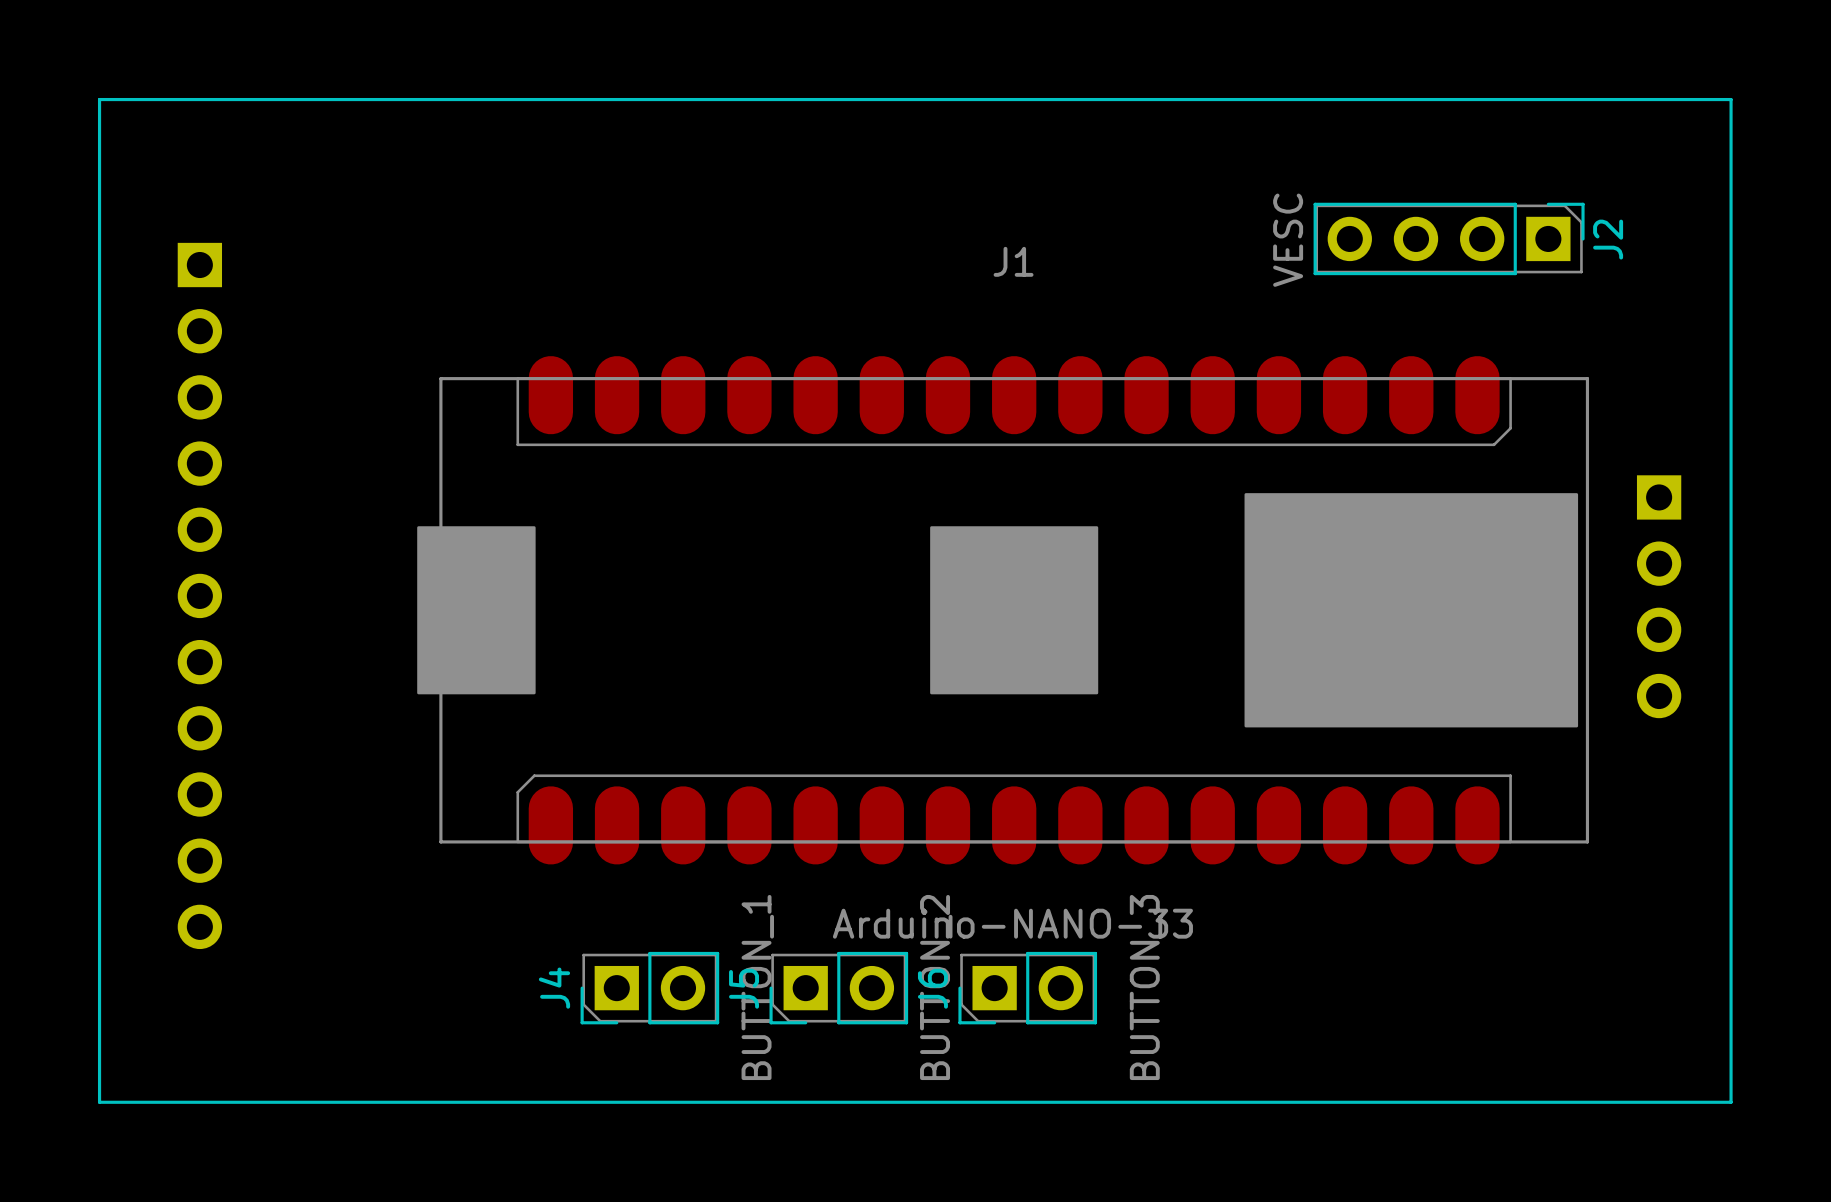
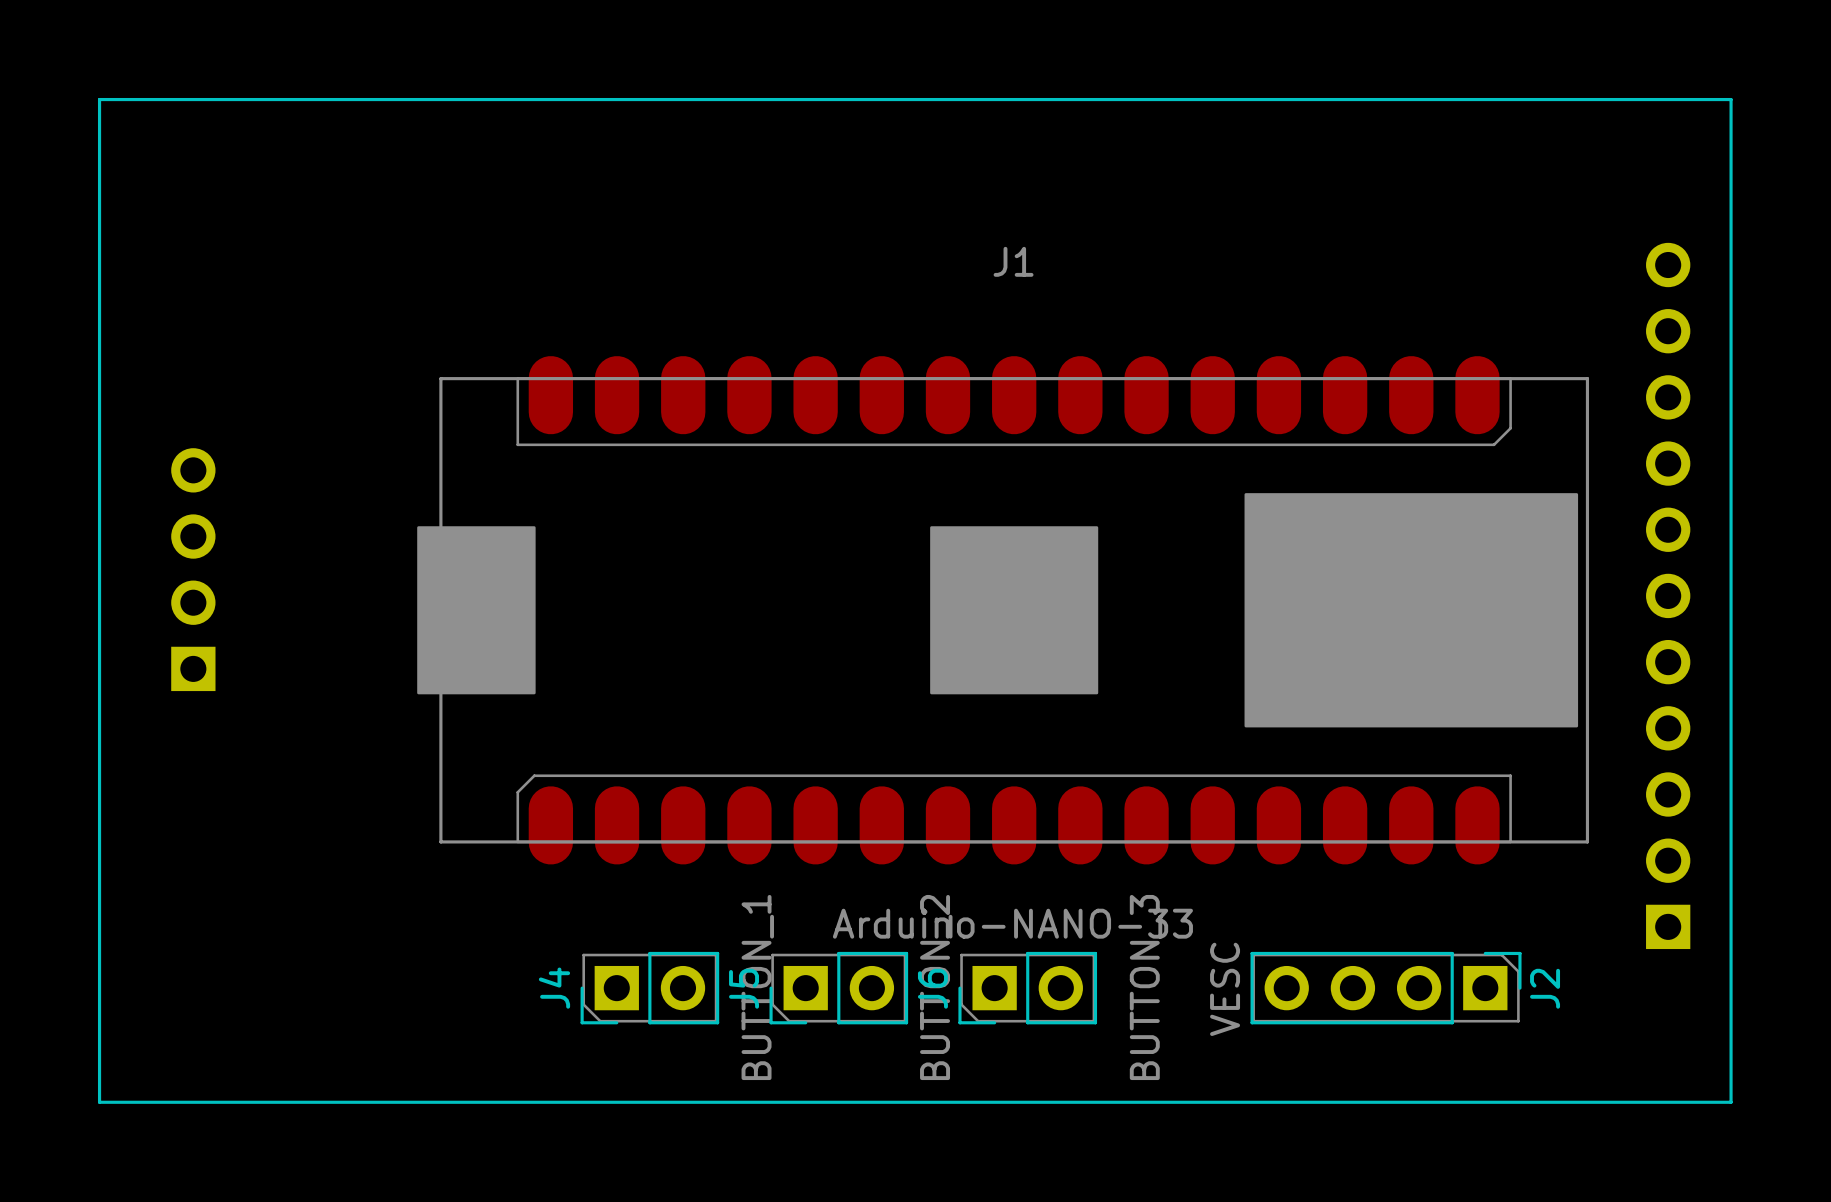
J2 position: (1449, 238) -> (1386, 988)
part footprint: [1636, 475, 1682, 719] -> [1646, 242, 1691, 950]
part: none -> (193, 569)
part: (199, 595) -> none

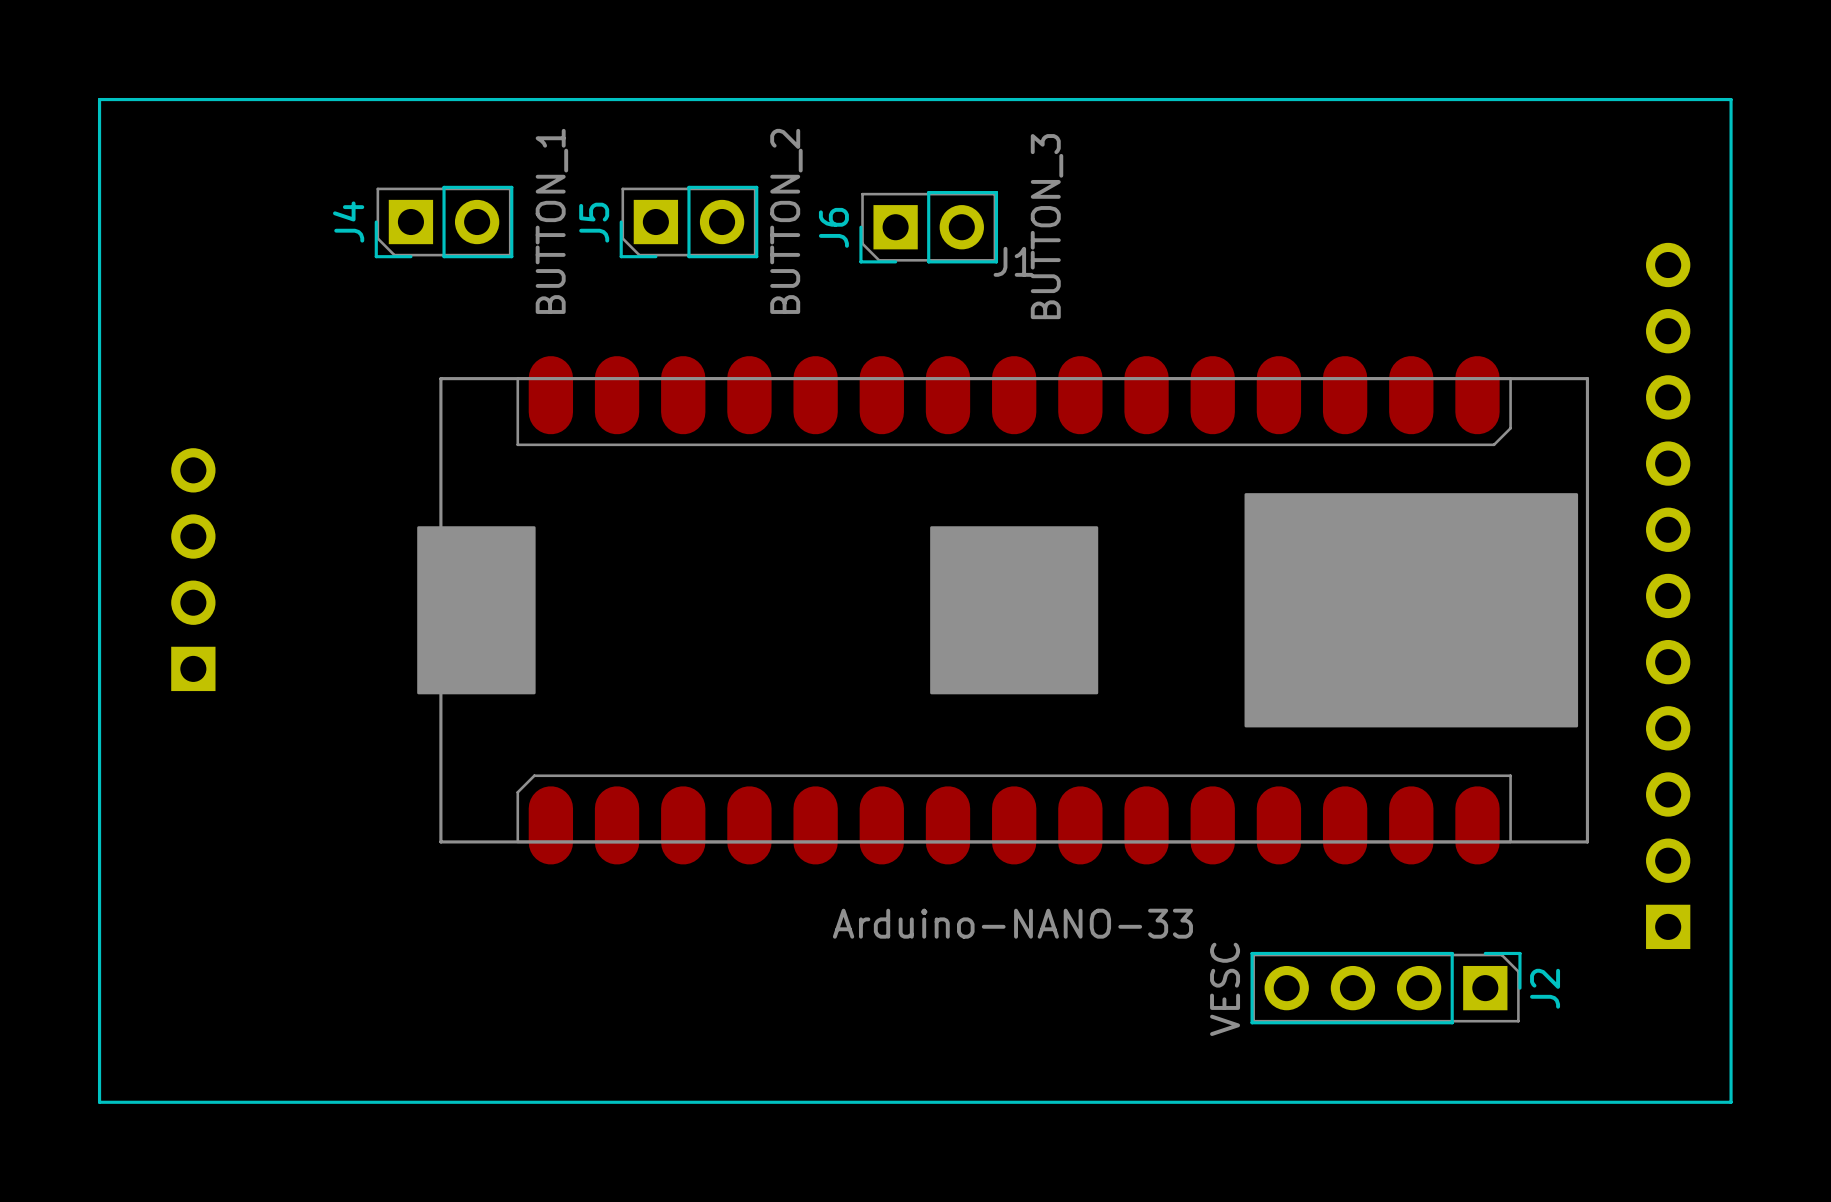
J4 position: (649, 988) -> (444, 222)
J5 position: (838, 988) -> (688, 222)
J6 position: (1027, 988) -> (928, 227)

